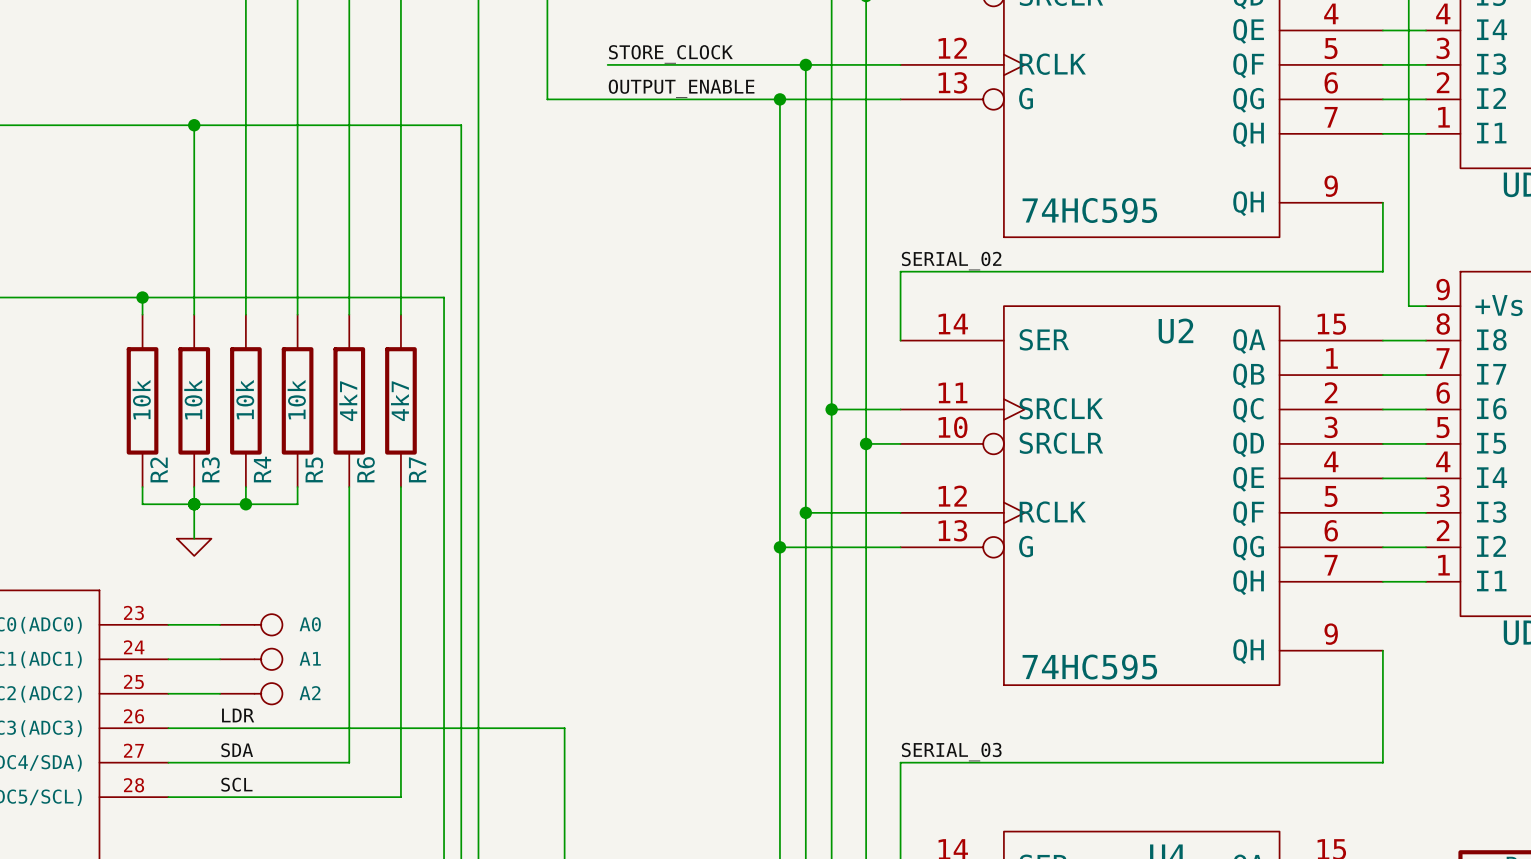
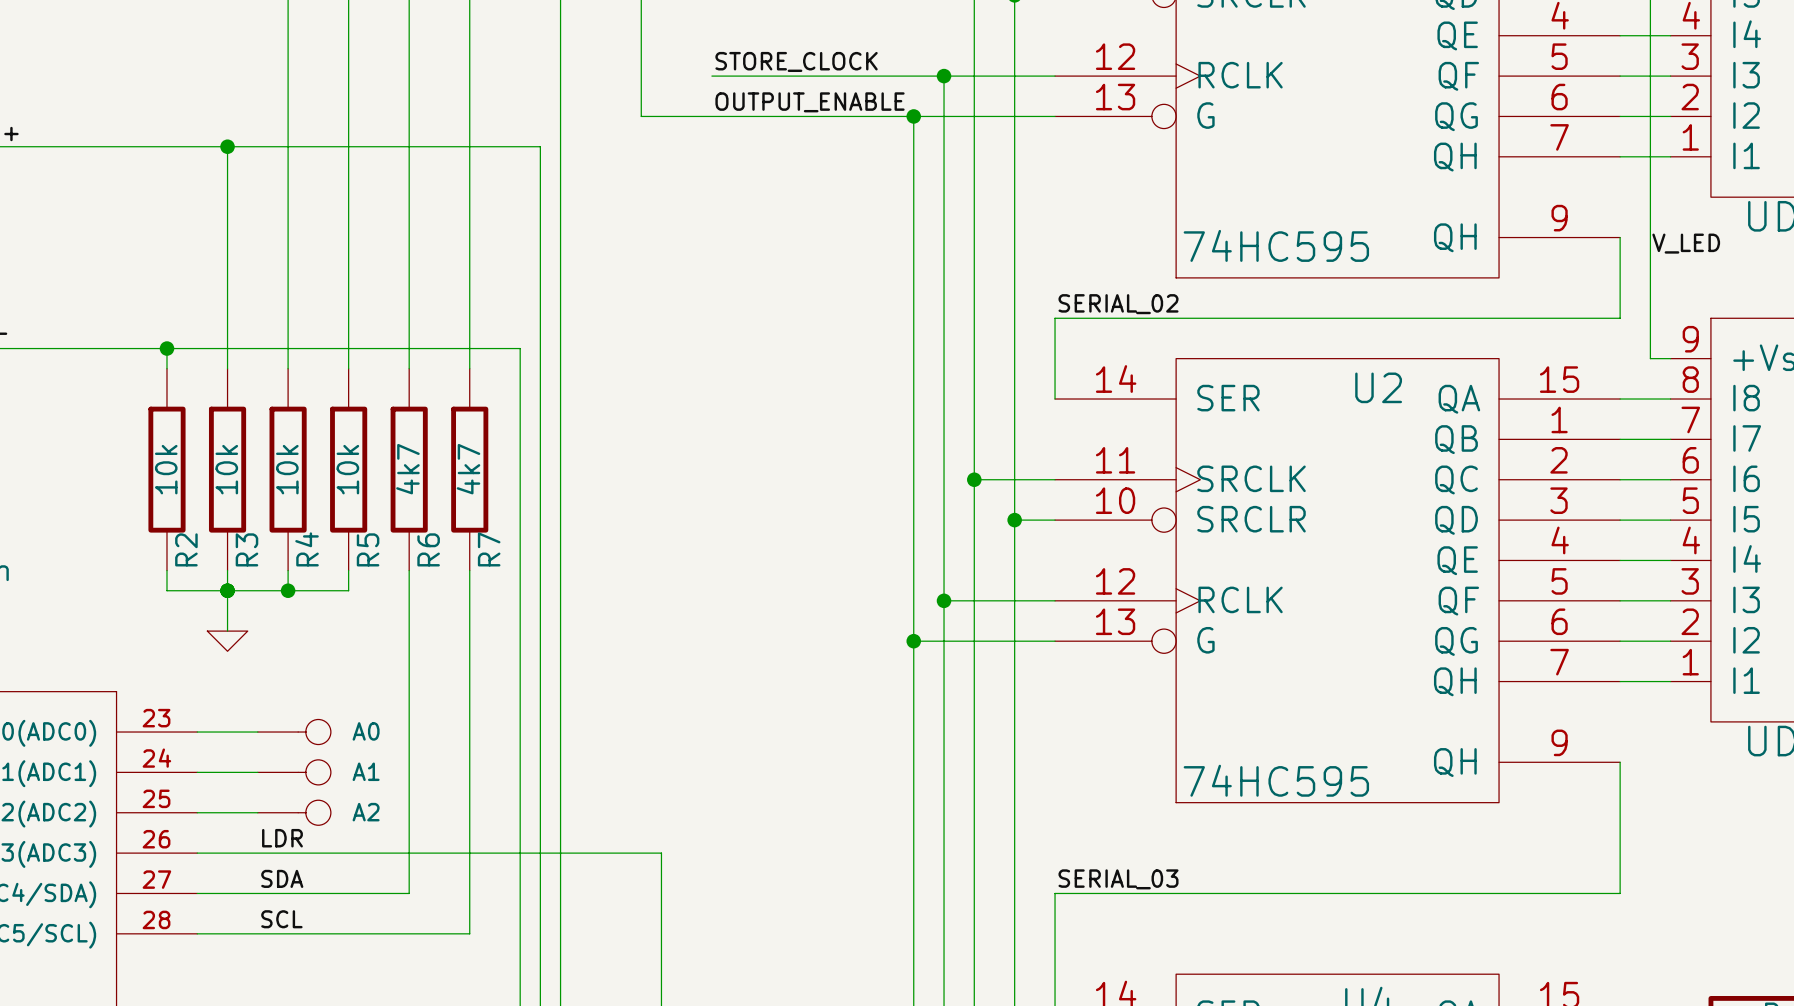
label: none -> V_LED (1686, 243)

